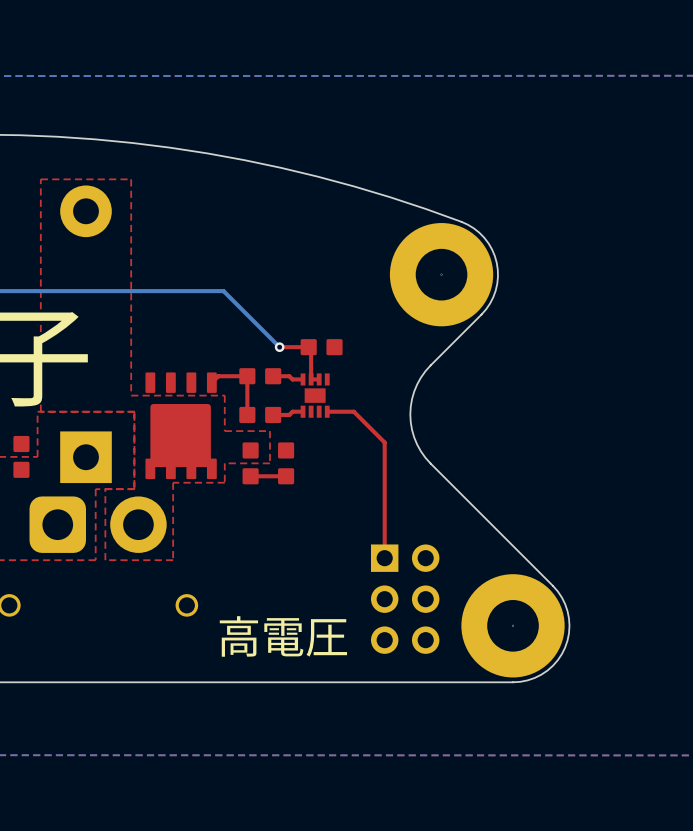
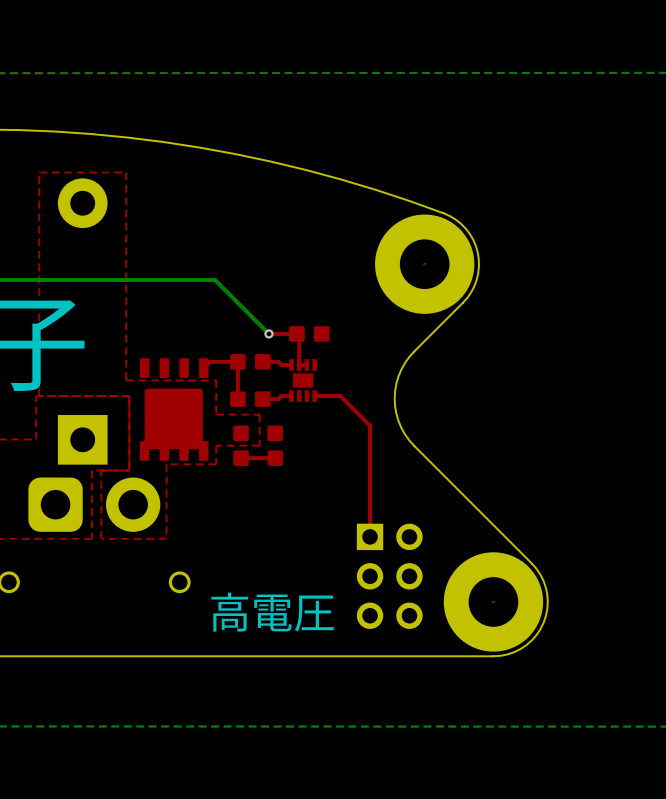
part: (21, 456) -> none

